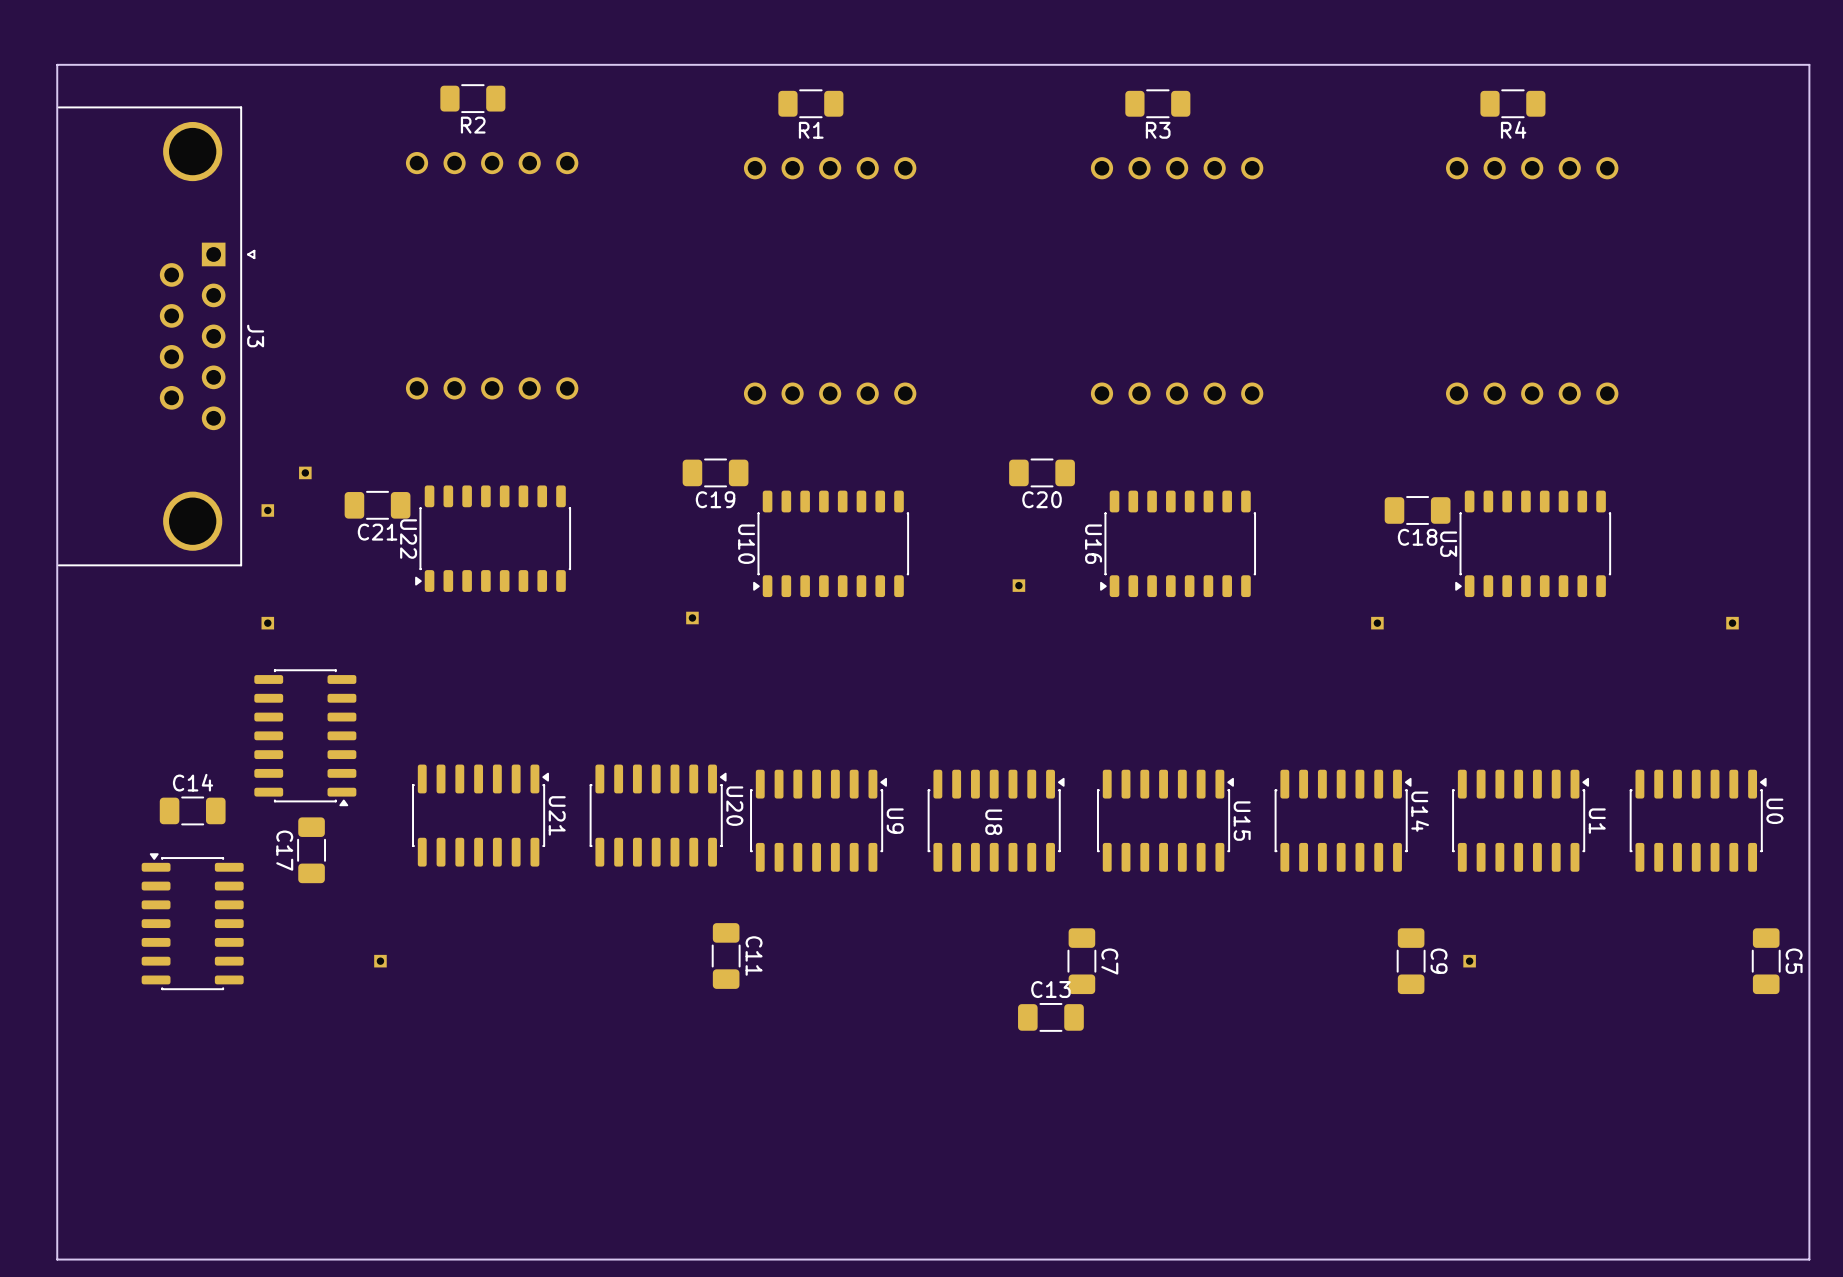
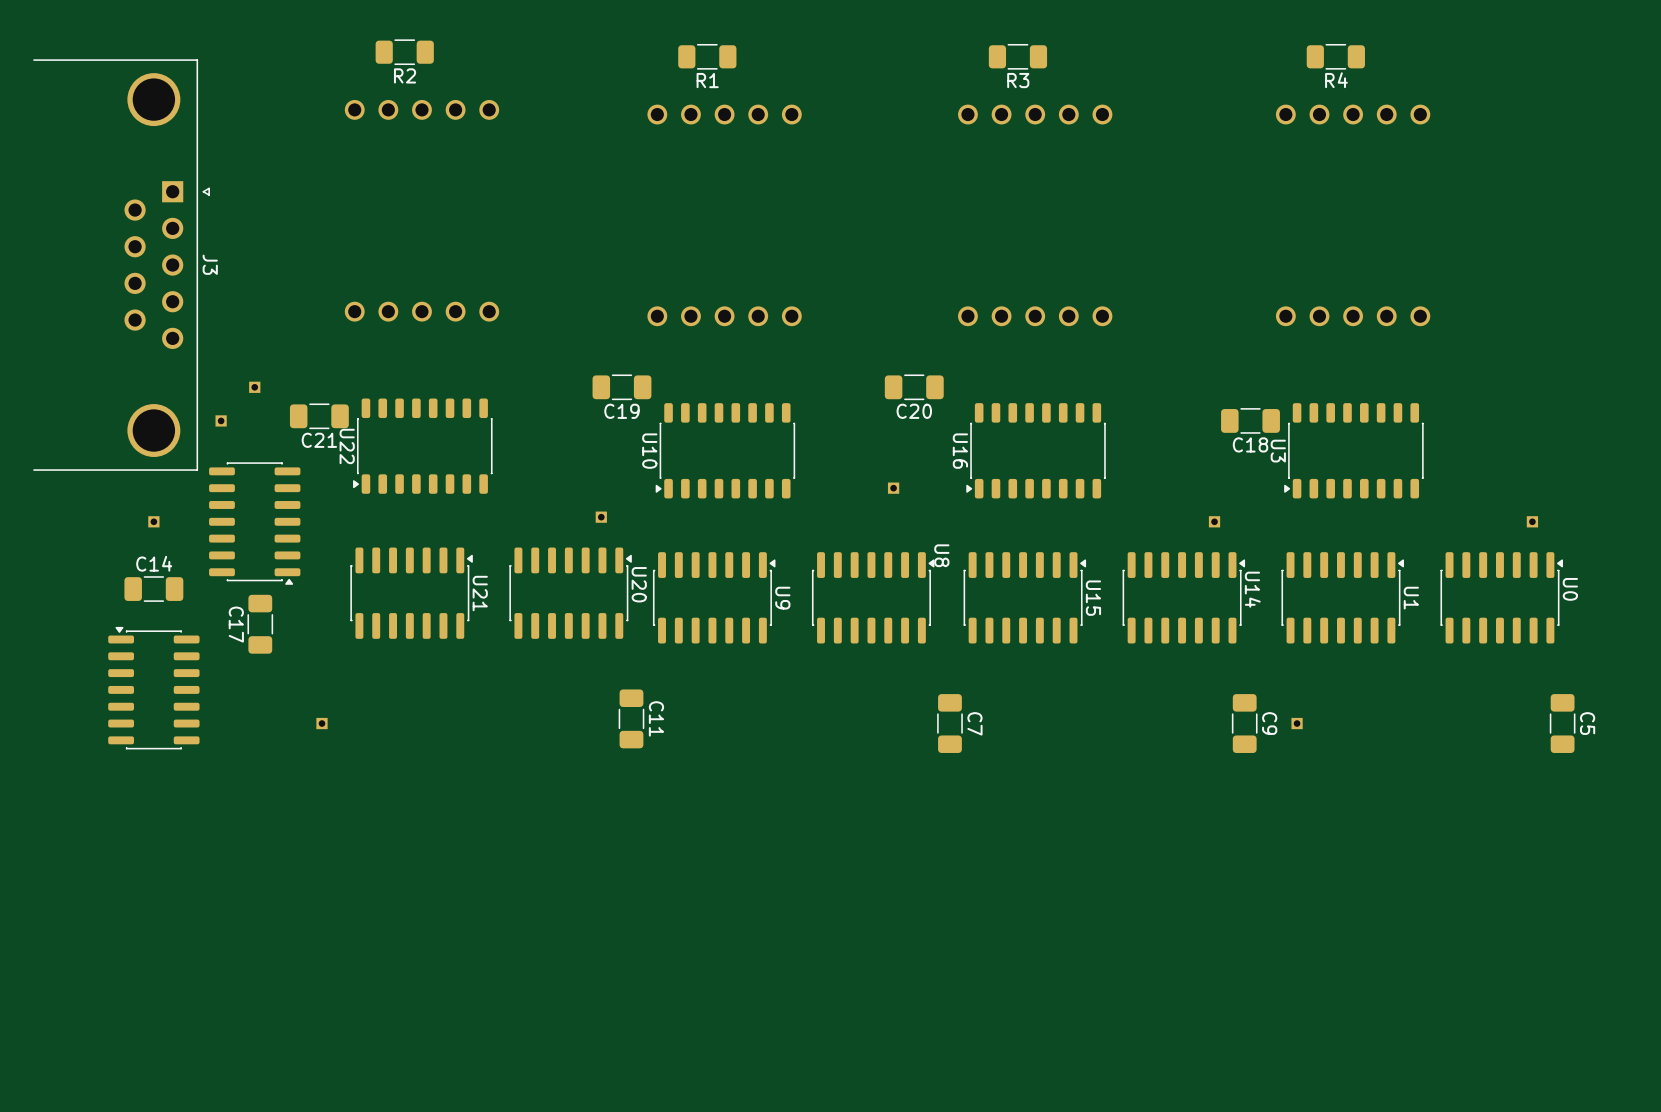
board edge: (1809, 64) (57, 64) (57, 1259) (1809, 1259) (1809, 64) -> none
part position: (267, 623) -> (153, 521)
part: none -> (254, 523)
part: (305, 737) -> none
part: none -> (153, 688)
C14 position: (192, 810) -> (153, 589)
U21 position: (480, 815) -> (411, 593)
U20 position: (658, 815) -> (570, 593)
U9 position: (818, 820) -> (714, 597)
U8 position: (996, 820) -> (873, 597)
U15 position: (1165, 820) -> (1024, 597)
U14 position: (1343, 820) -> (1183, 597)
U1 position: (1520, 820) -> (1342, 597)
U0 position: (1698, 820) -> (1501, 597)
U8 name position: U8 (993, 822) -> U8 (941, 555)
C17 position: (311, 850) -> (260, 624)
part: (192, 921) -> none
C11 position: (726, 956) -> (631, 718)
part position: (380, 961) -> (321, 723)
C7 position: (1081, 961) -> (949, 723)
C9 position: (1411, 961) -> (1244, 723)
part position: (1469, 961) -> (1297, 723)
C5 position: (1766, 961) -> (1562, 723)
C13: (1050, 1017) -> none

